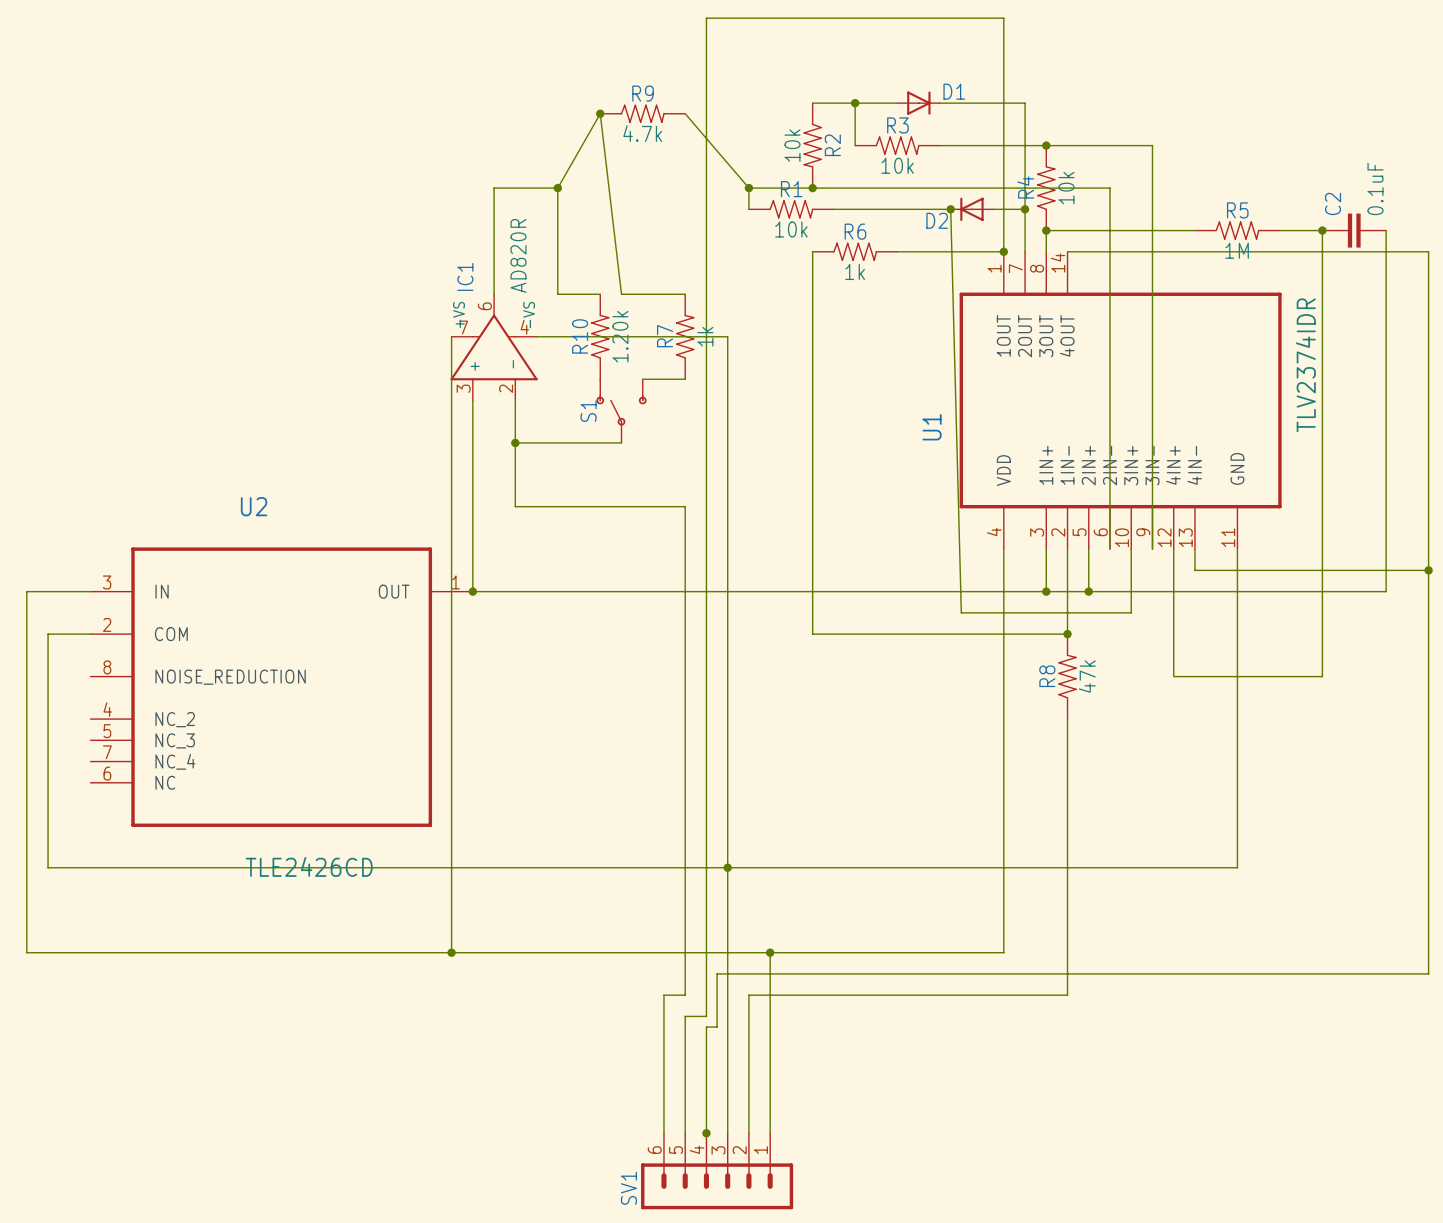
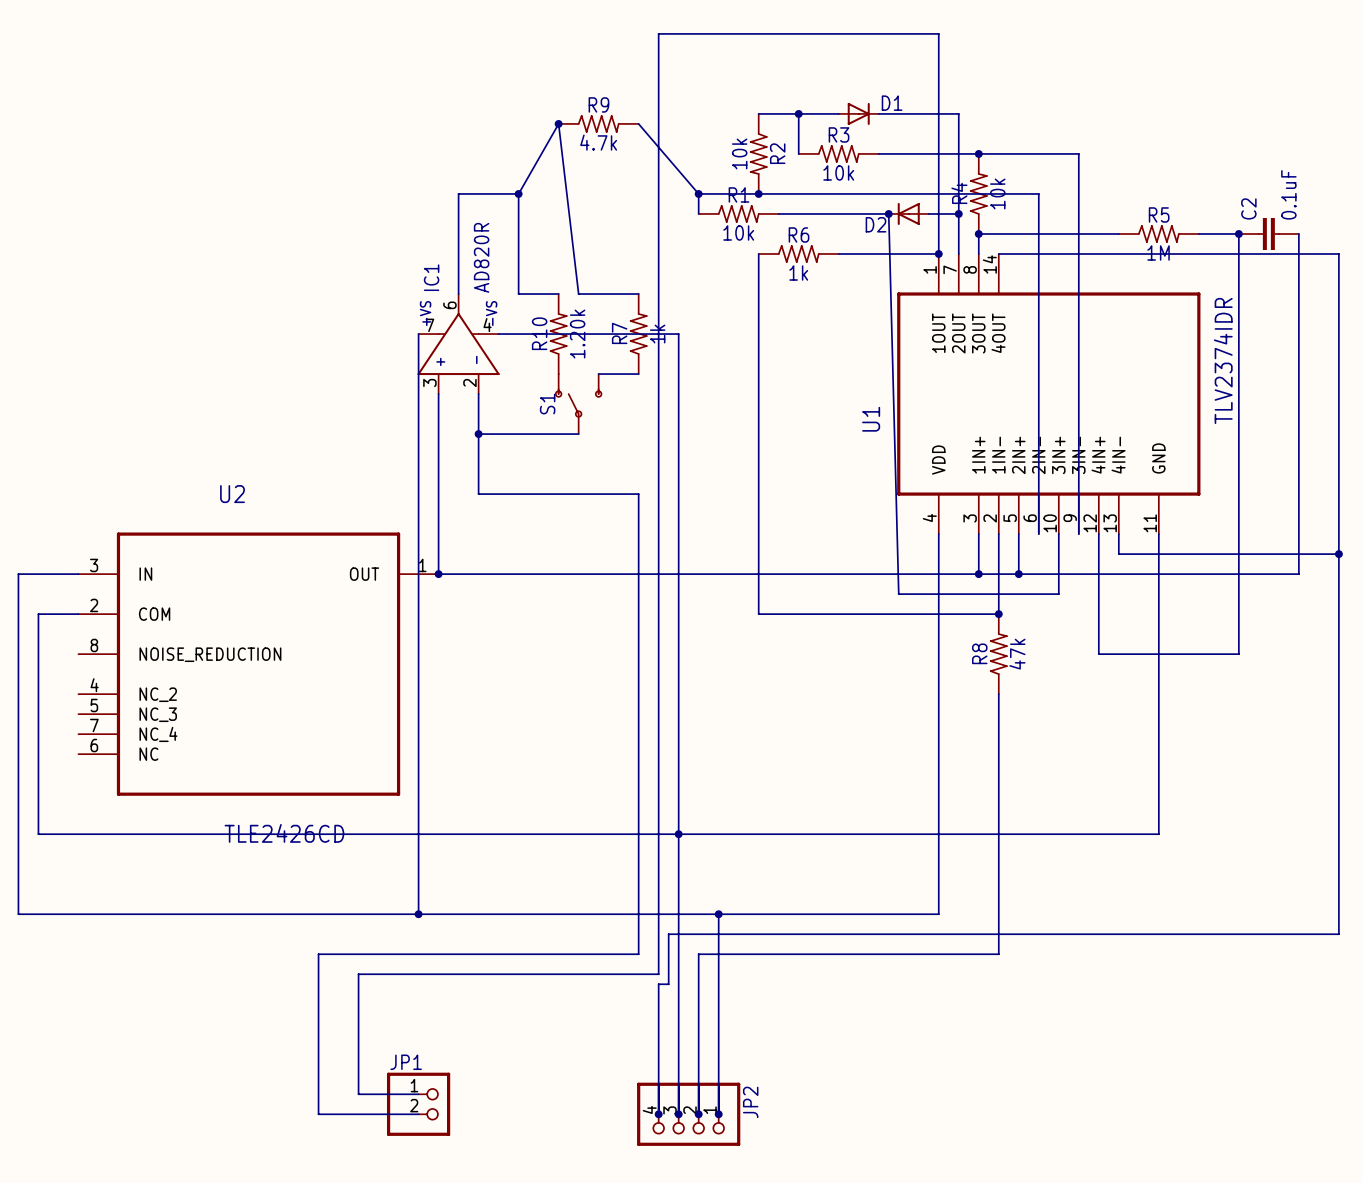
wire: (663, 995) (663, 1133) -> (618, 954) (318, 954) (318, 1114) (418, 1114)
wire: (685, 1016) (685, 1133) -> (638, 974) (358, 974) (358, 1094) (418, 1094)
junction: (706, 1133) -> none
JP1: none -> (418, 1104)
junction: none -> (658, 1114)
junction: none -> (678, 1114)
JP2: none -> (688, 1114)
junction: none -> (698, 1114)
junction: none -> (718, 1114)
SV1: (717, 1171) -> none

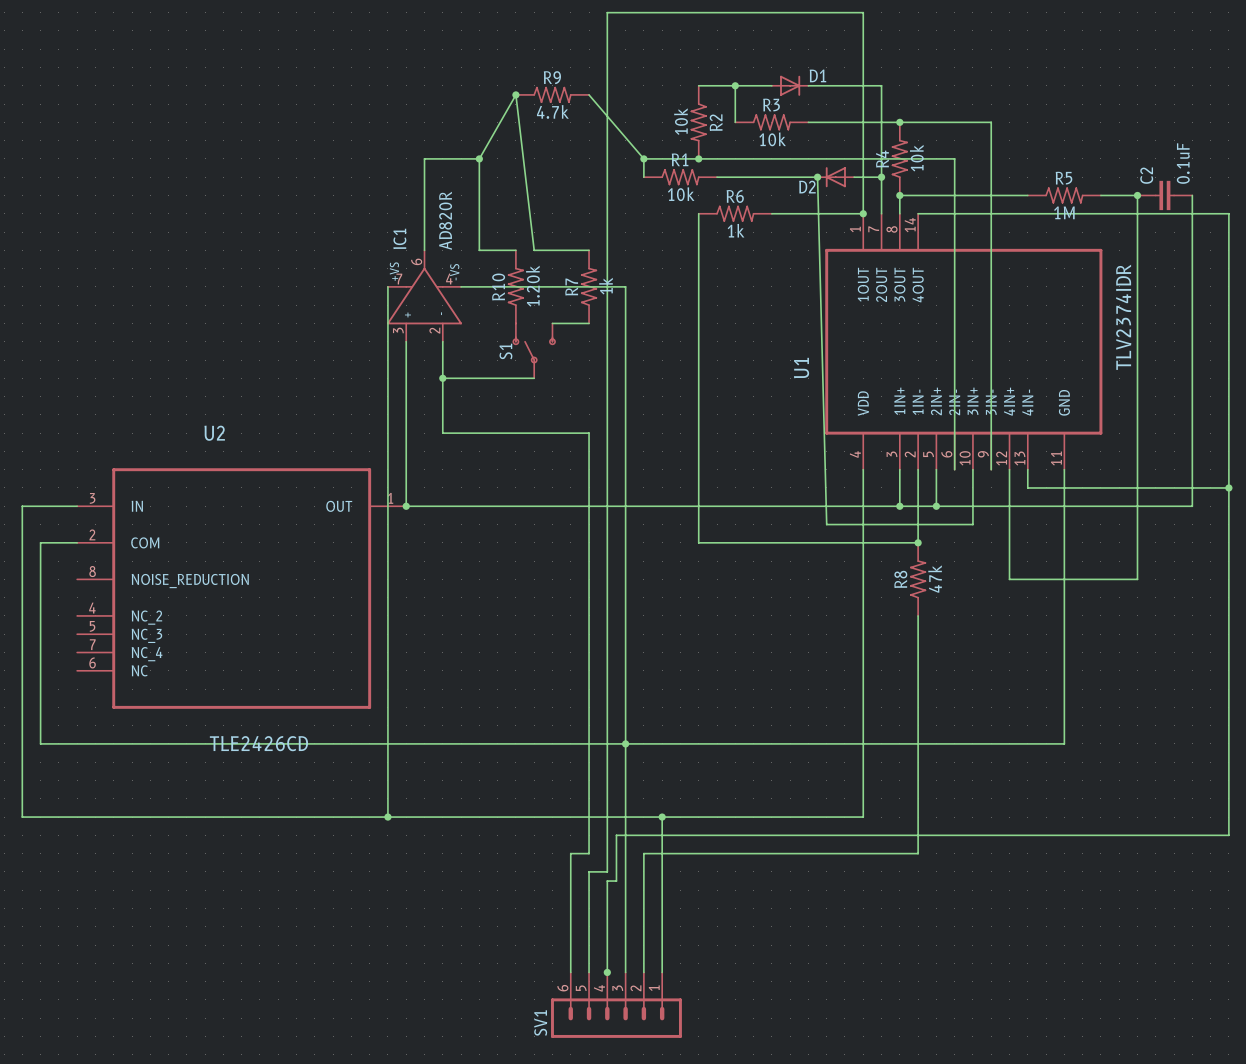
wire: (618, 954) (318, 954) (318, 1114) (418, 1114) -> (570, 853) (570, 972)
wire: (638, 974) (358, 974) (358, 1094) (418, 1094) -> (589, 871) (589, 972)
junction: none -> (607, 972)
JP1: (418, 1104) -> none
junction: (658, 1114) -> none
junction: (678, 1114) -> none
JP2: (688, 1114) -> none
junction: (698, 1114) -> none
junction: (718, 1114) -> none
SV1: none -> (616, 1005)

